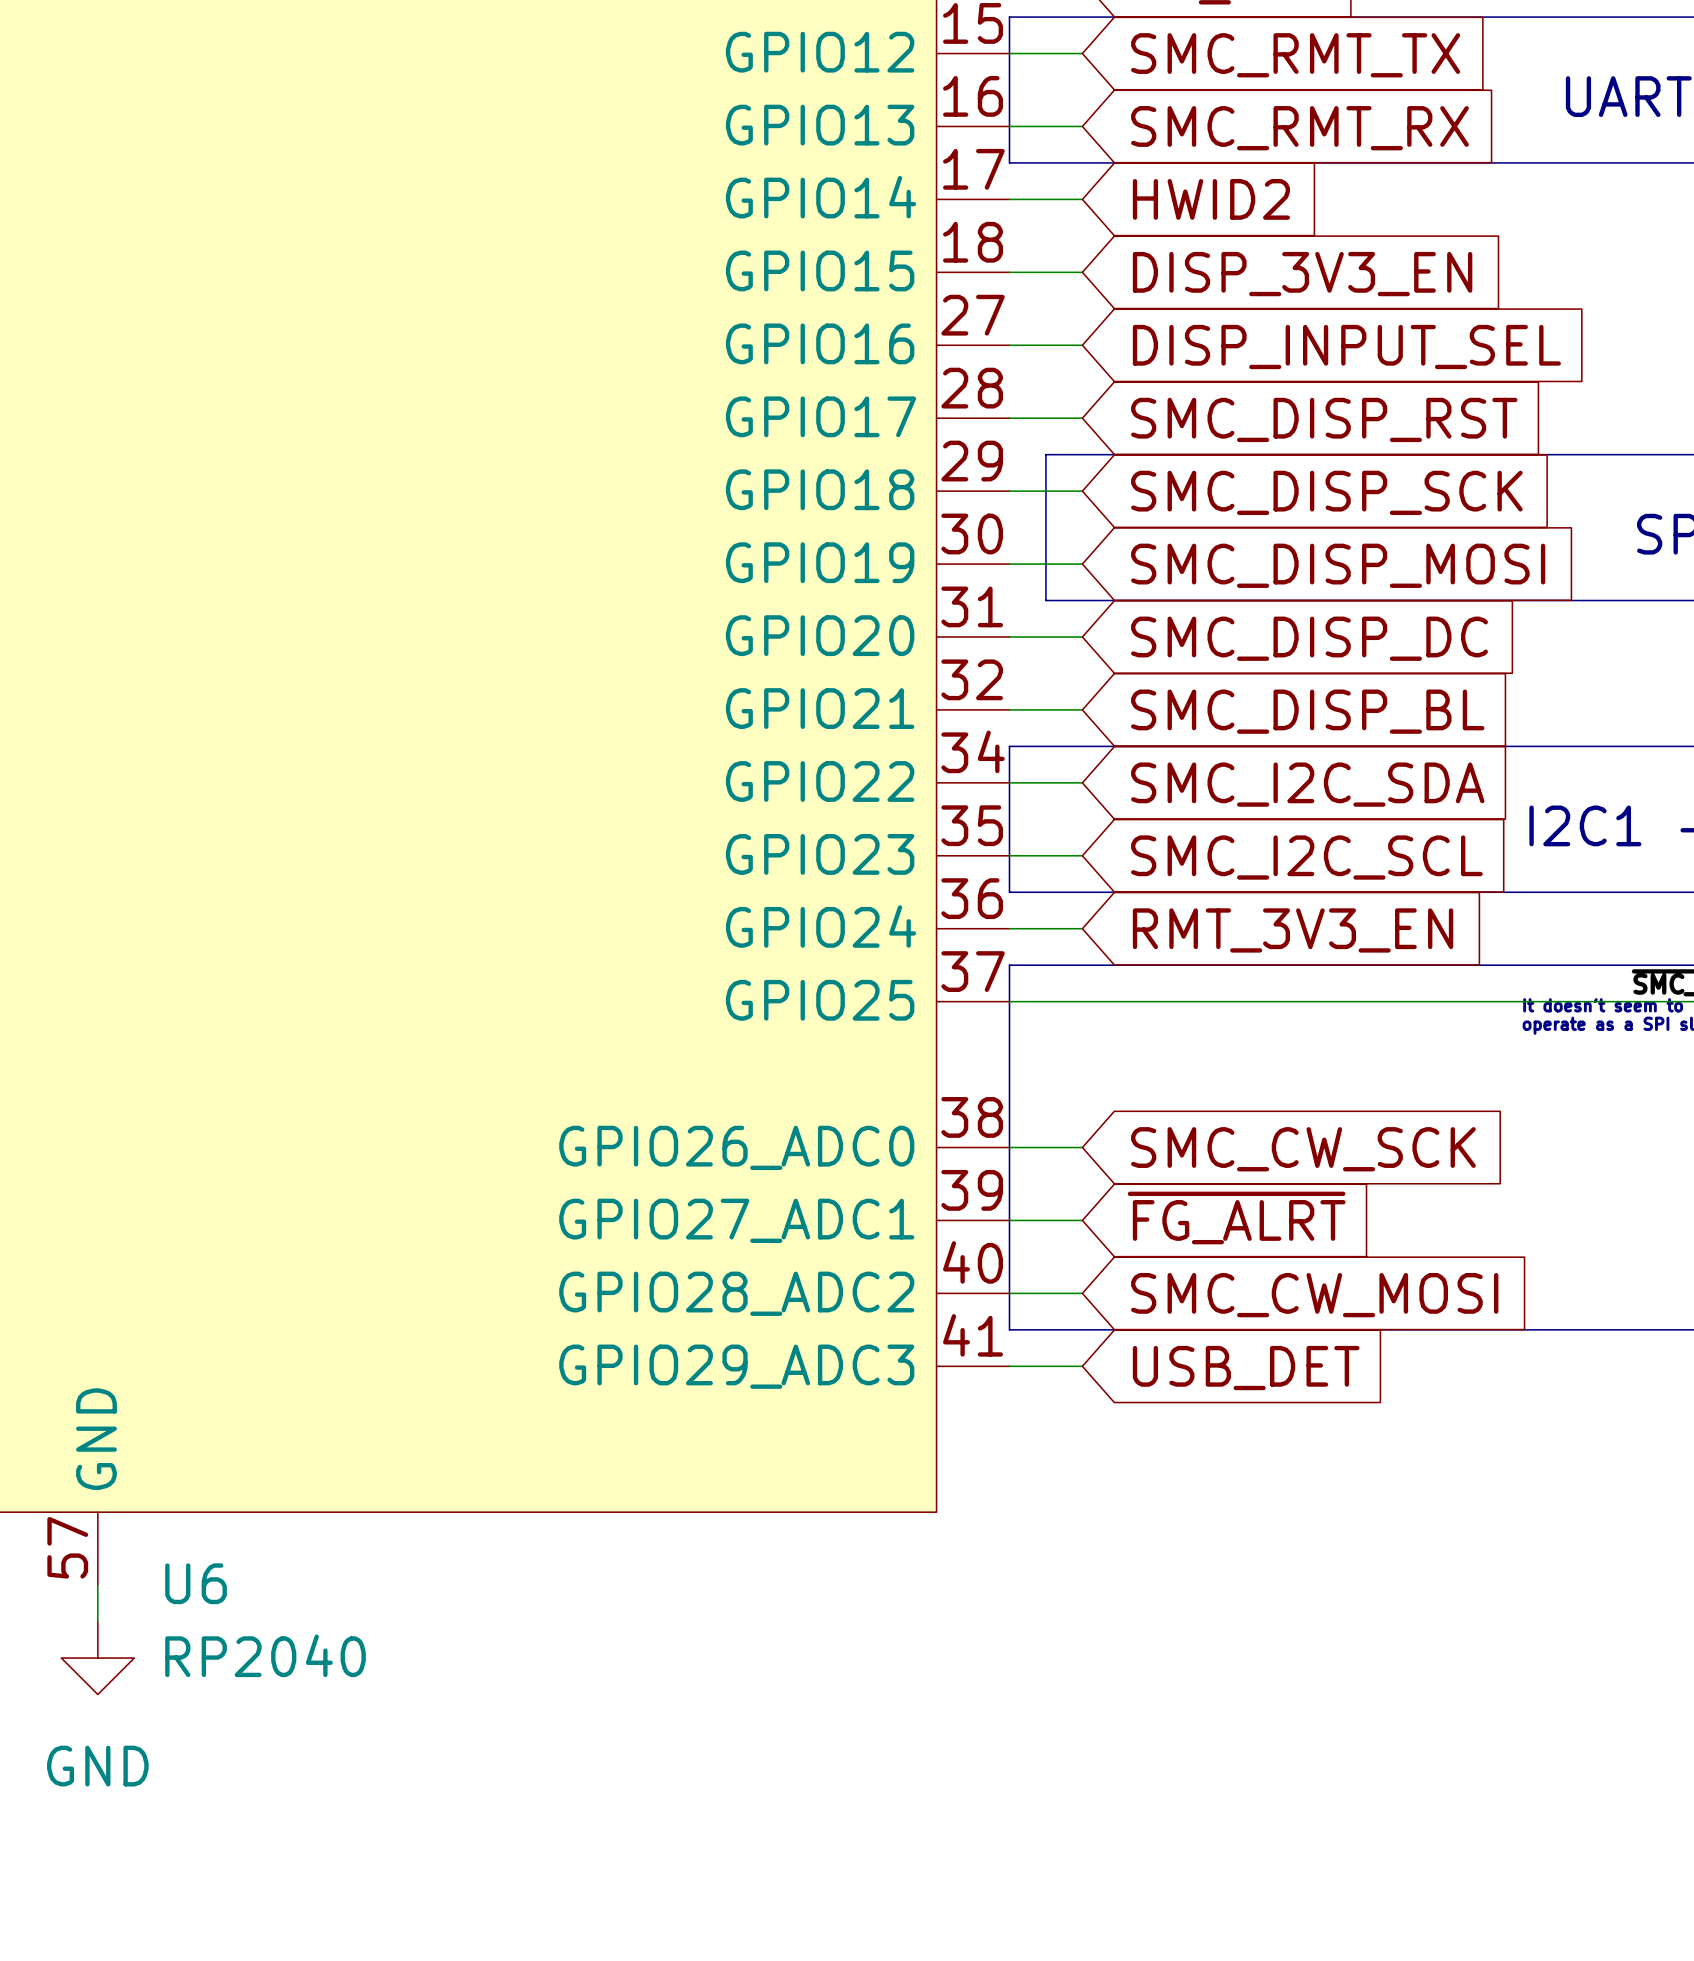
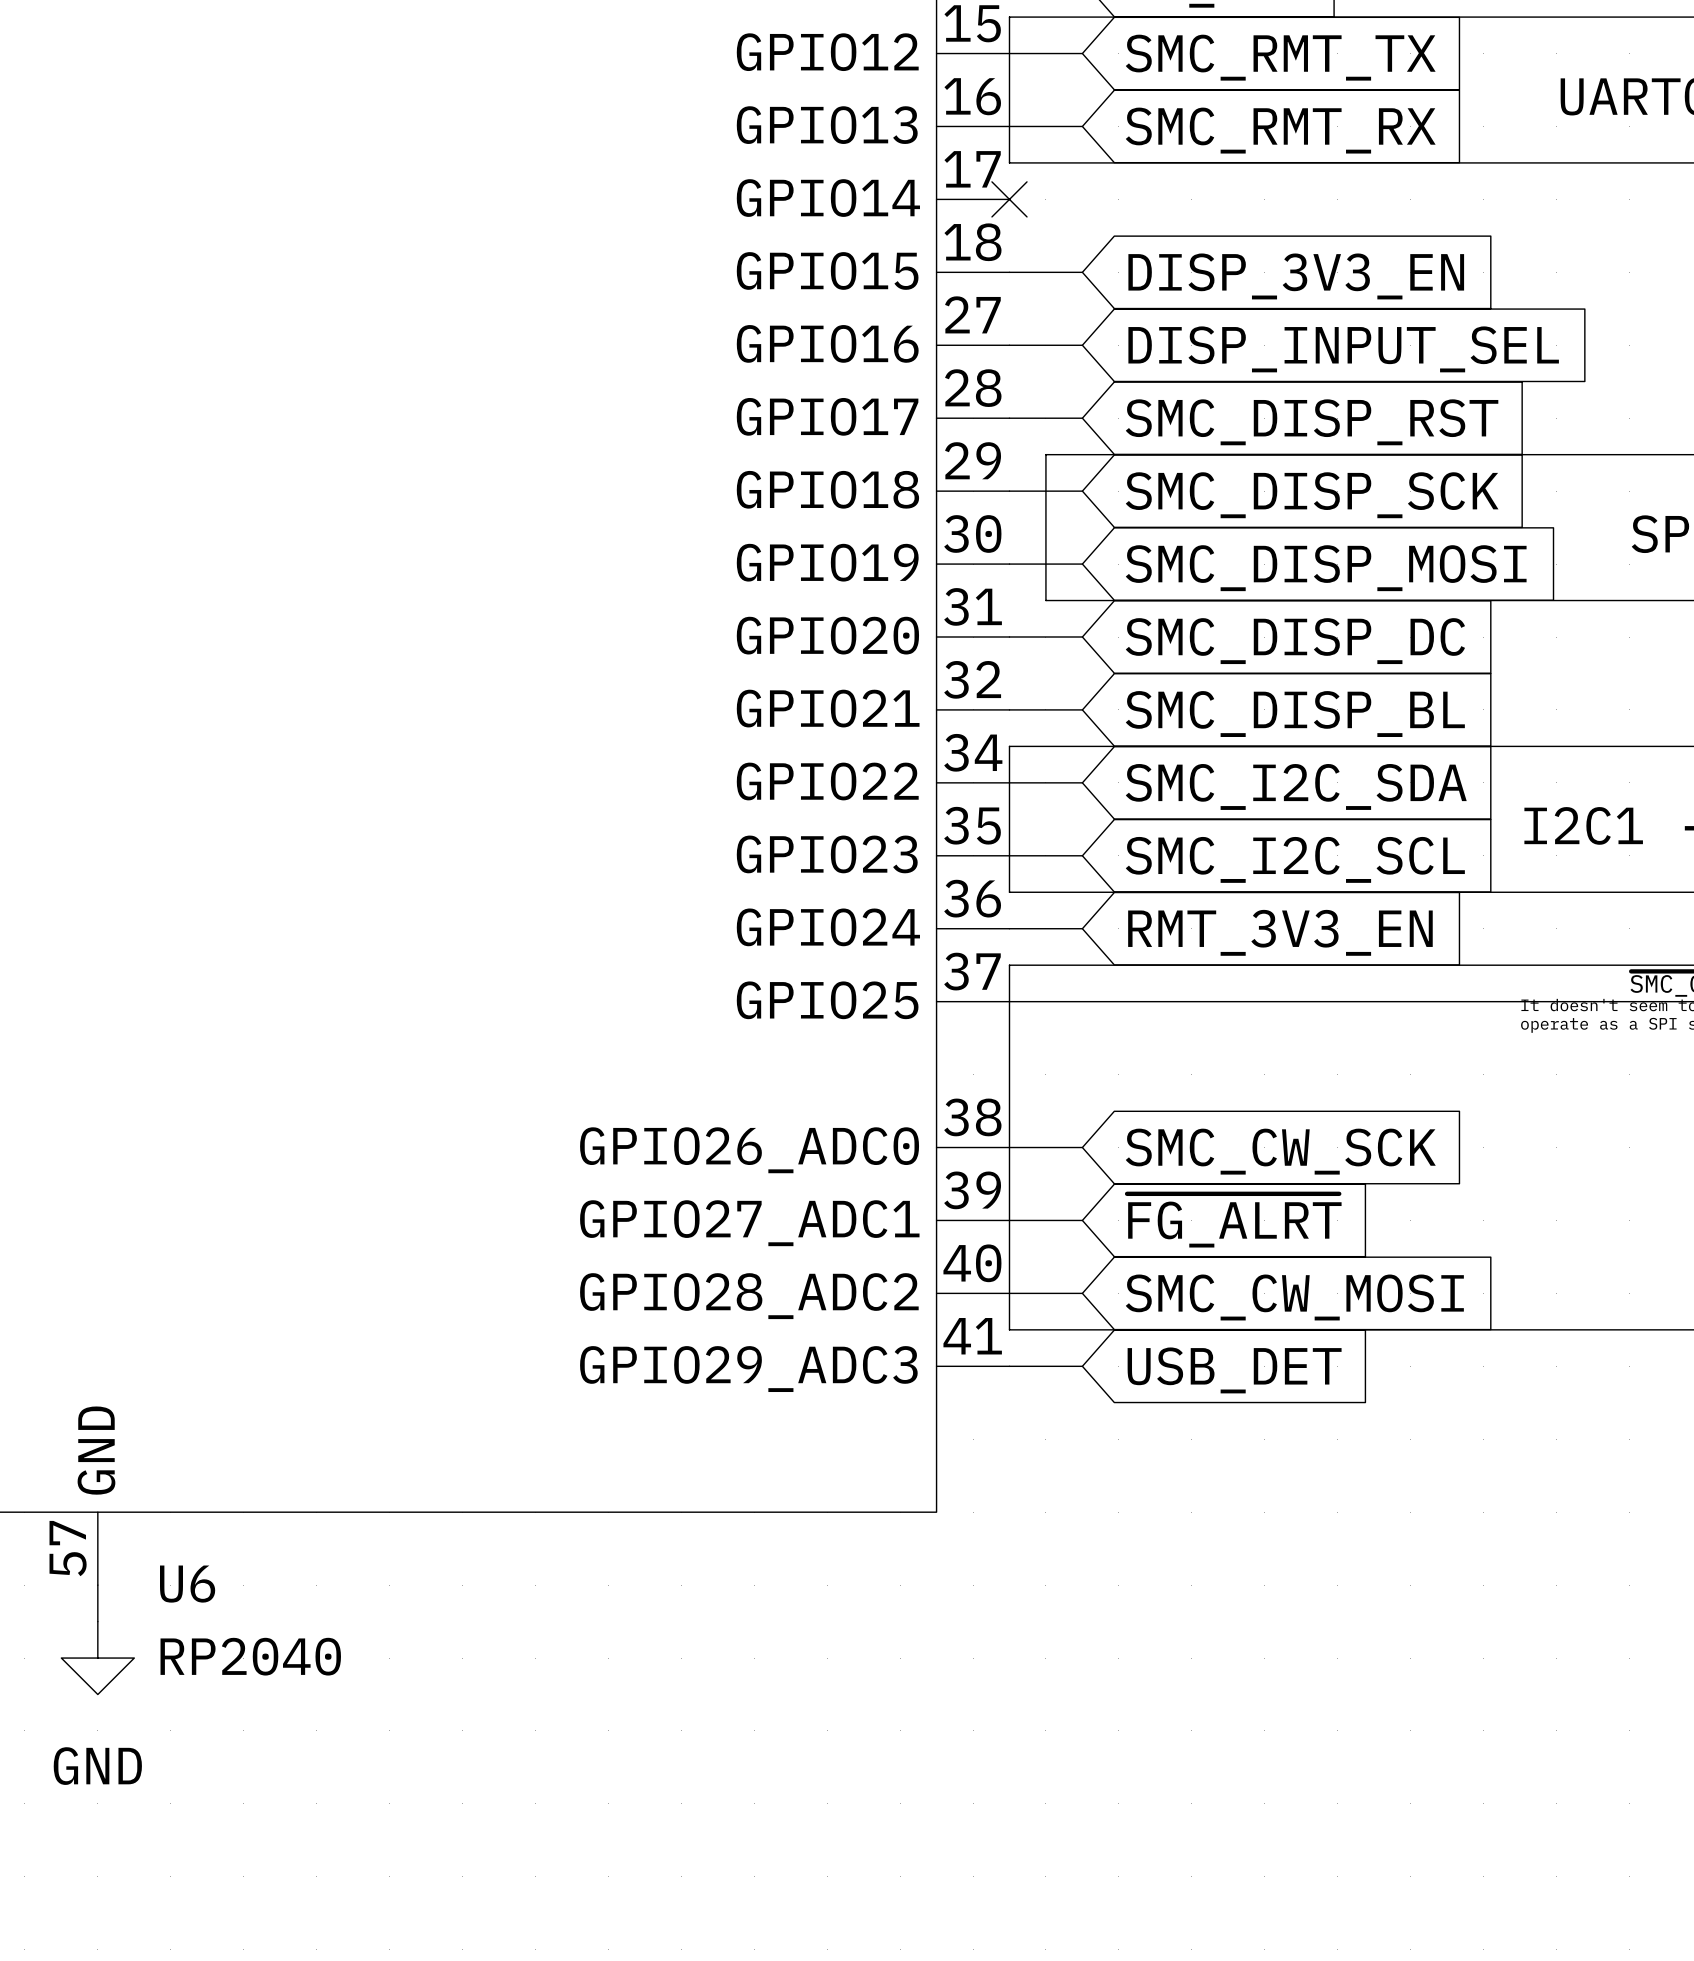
wire: (1009, 199) (1082, 199) -> none
no-connect mark: none -> (1009, 199)
global label: HWID2 (1211, 199) -> none

